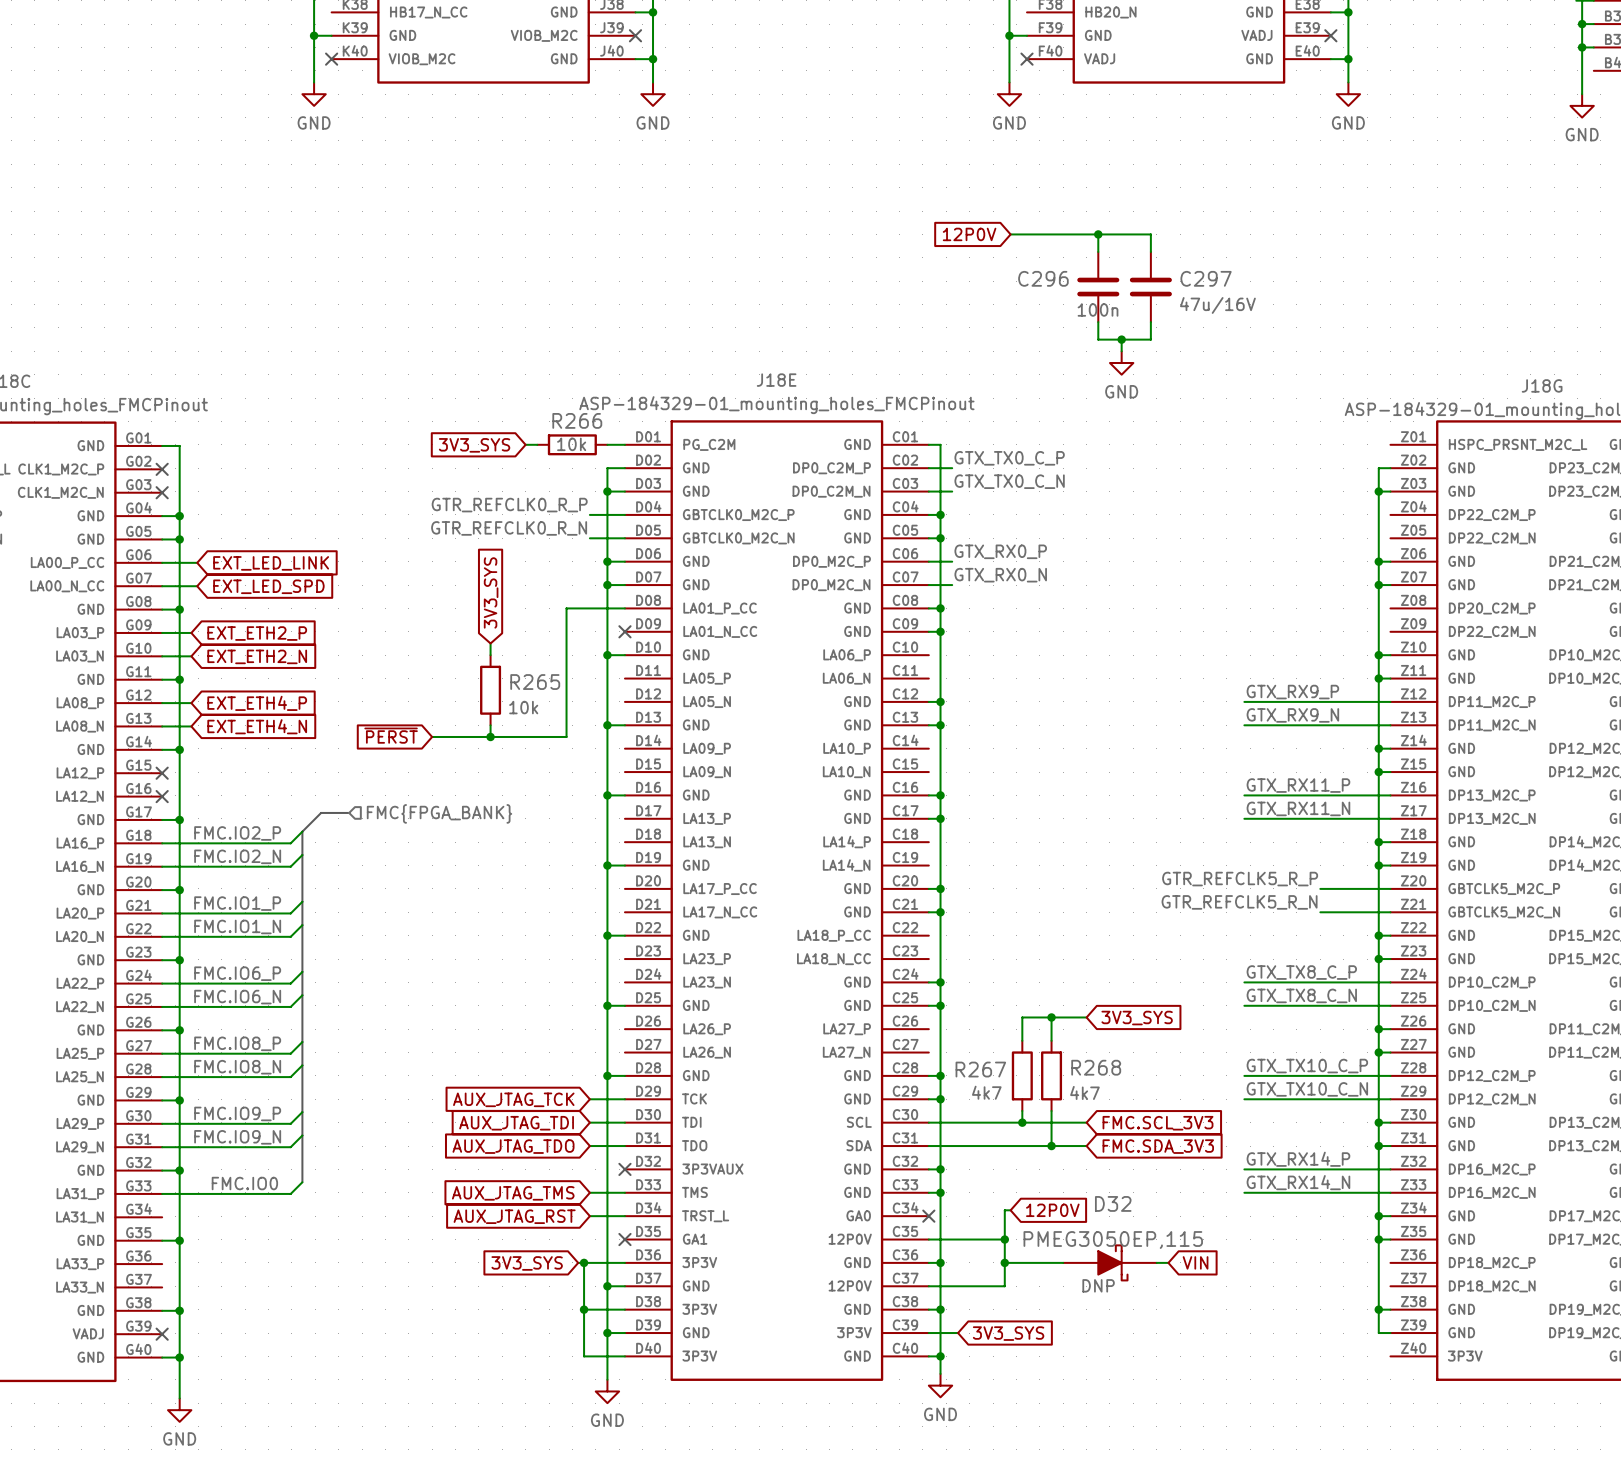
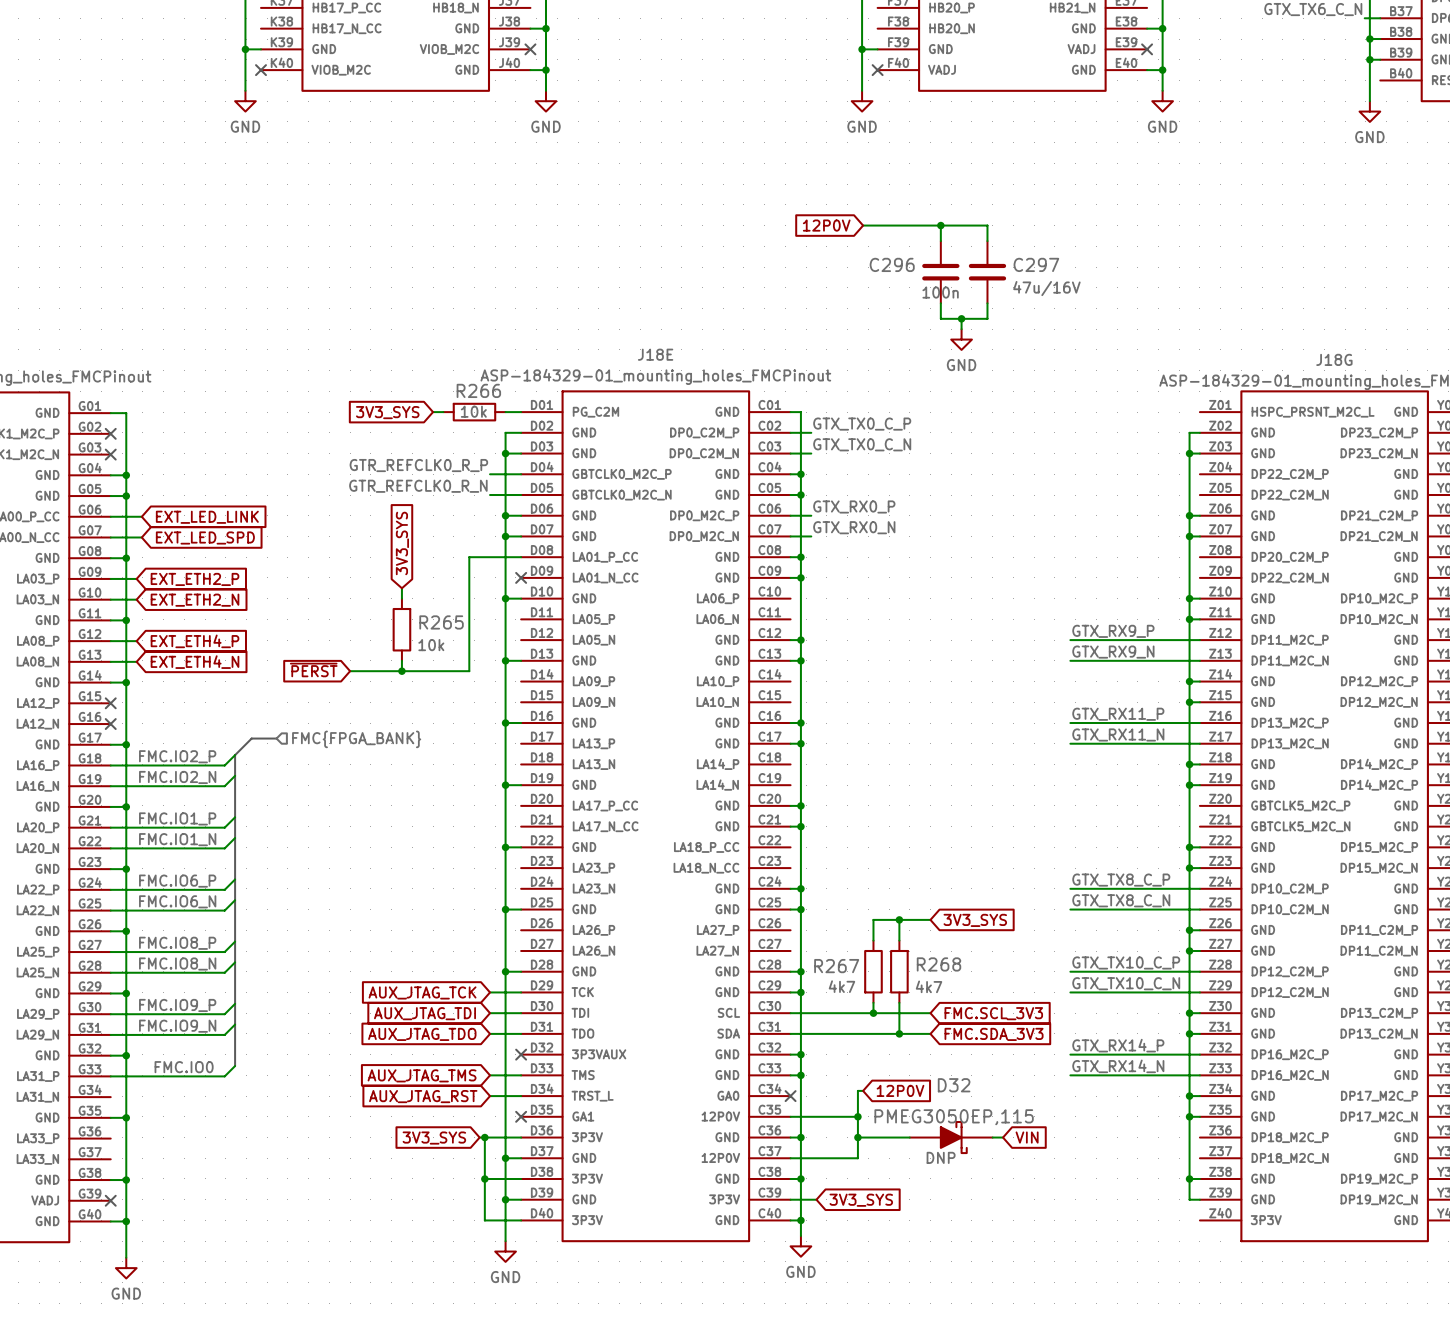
label: GTR_REFCLK5_R_P (1240, 879) -> none
wire: (1320, 888) (1390, 888) -> none
label: GTR_REFCLK5_R_N (1239, 902) -> none
wire: (1320, 912) (1390, 912) -> none

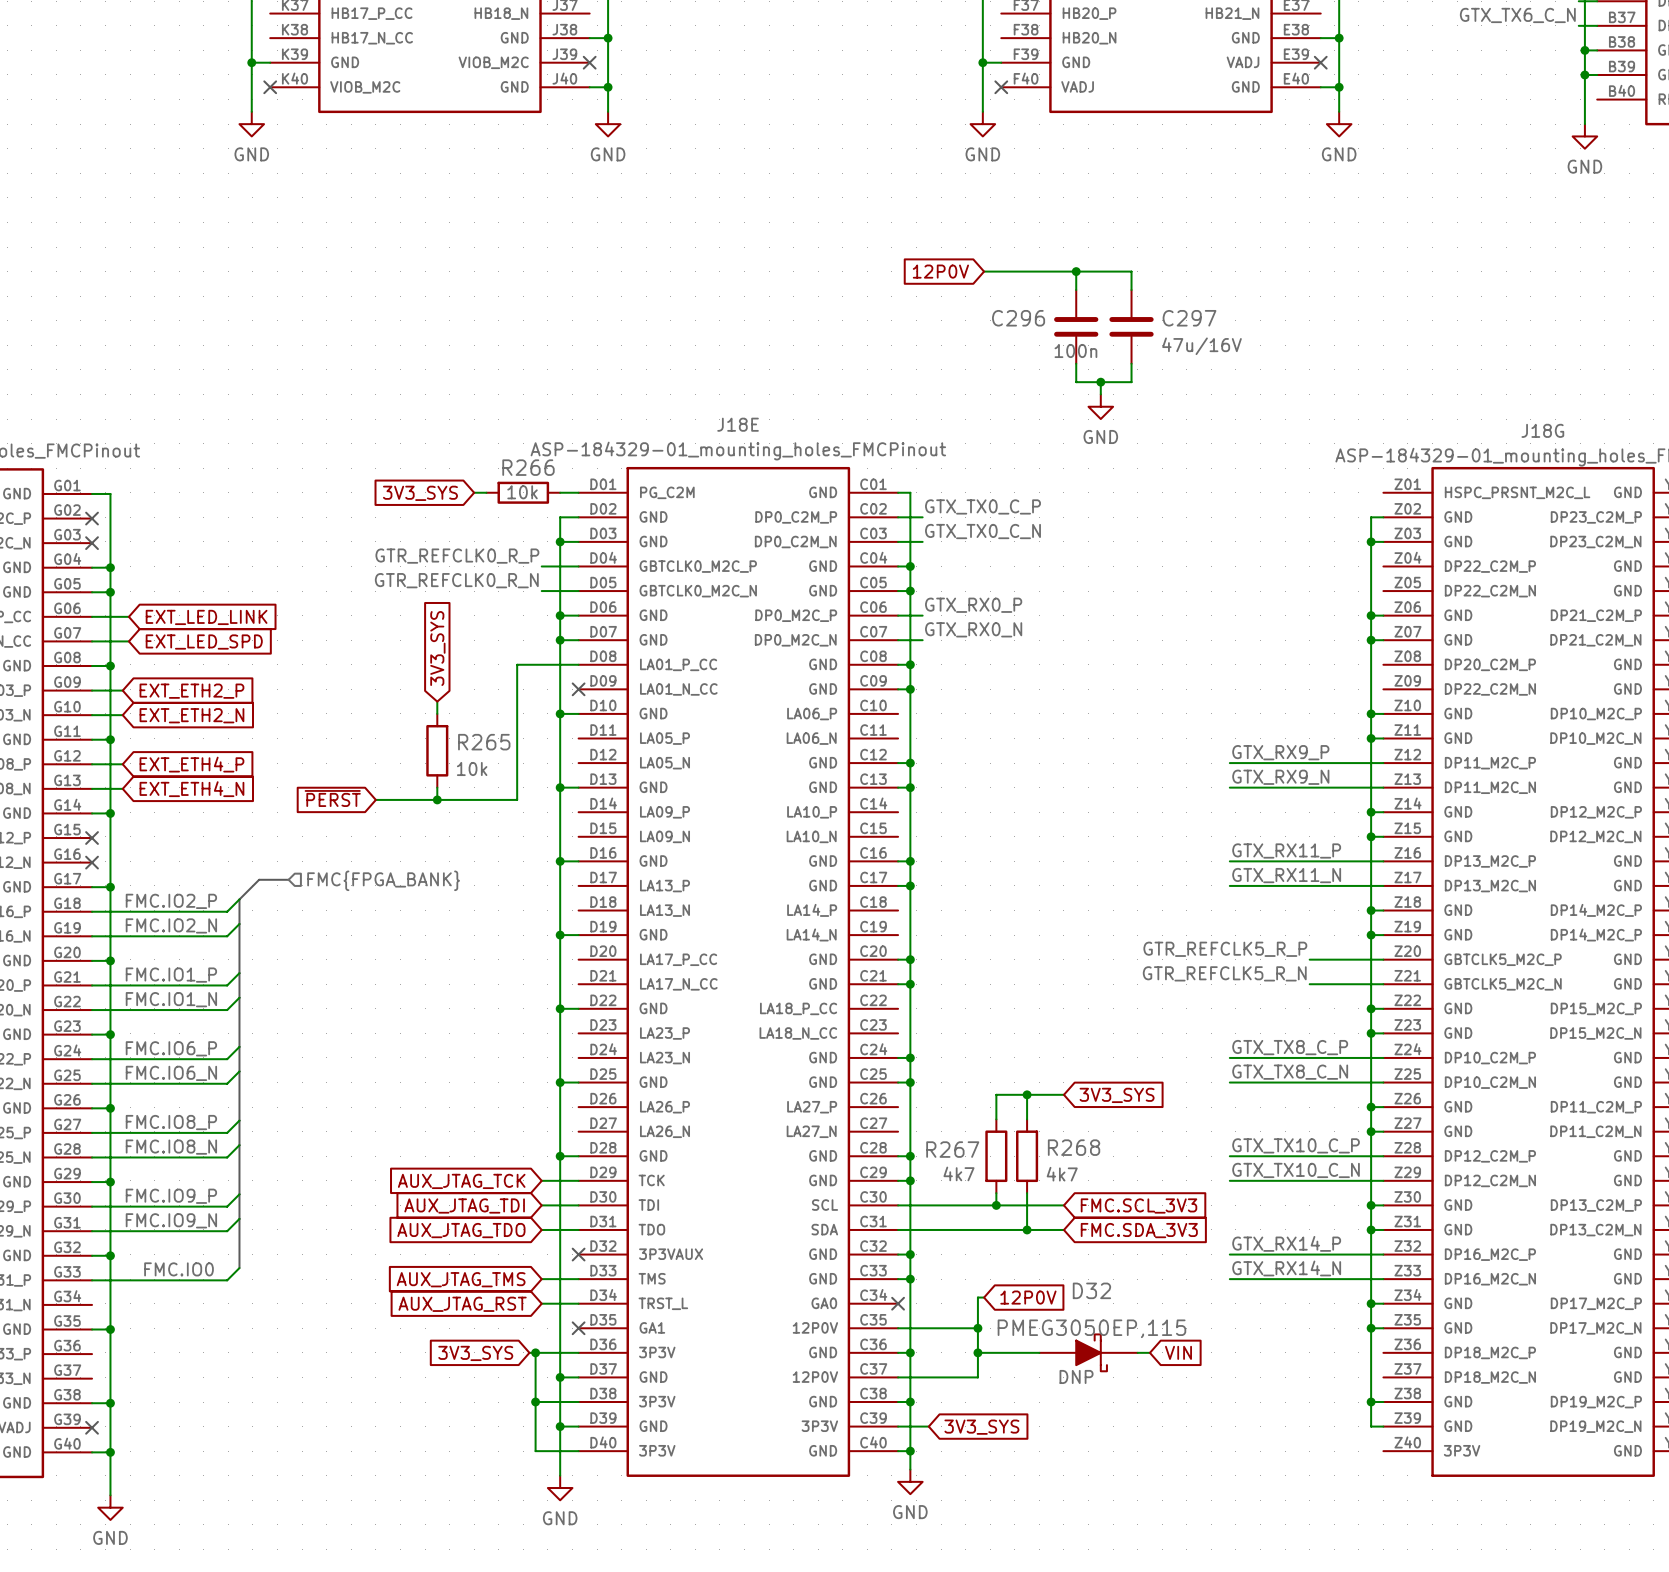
label: none -> GTR_REFCLK5_R_P (1225, 949)
wire: none -> (1309, 959) (1383, 959)
label: none -> GTR_REFCLK5_R_N (1224, 973)
wire: none -> (1309, 984) (1383, 984)

